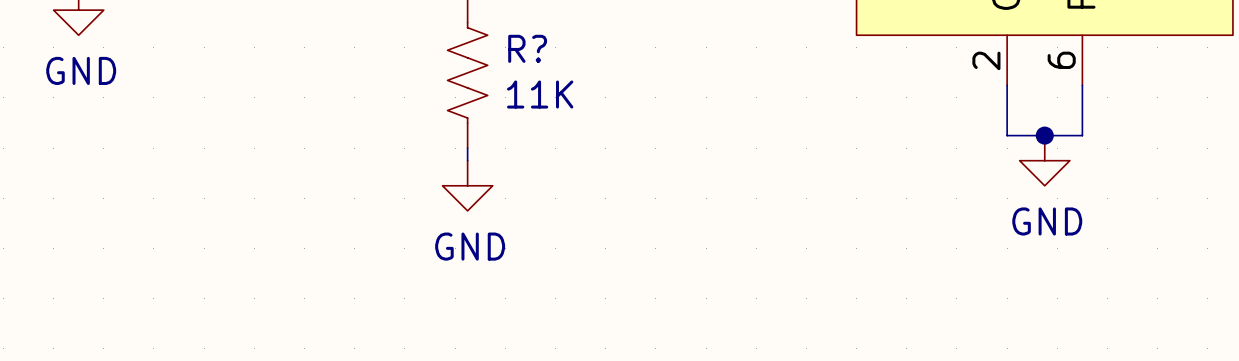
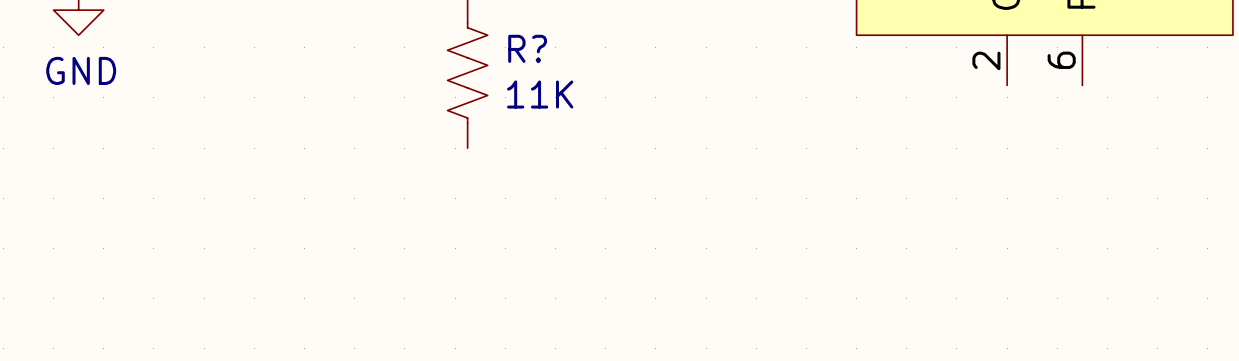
wire: (1007, 85) (1007, 135) (1082, 135) (1082, 85) -> none
junction: (1044, 135) -> none
wire: (467, 148) (467, 160) -> none
power symbol: GND (1044, 160) -> none
power symbol: GND (467, 185) -> none

